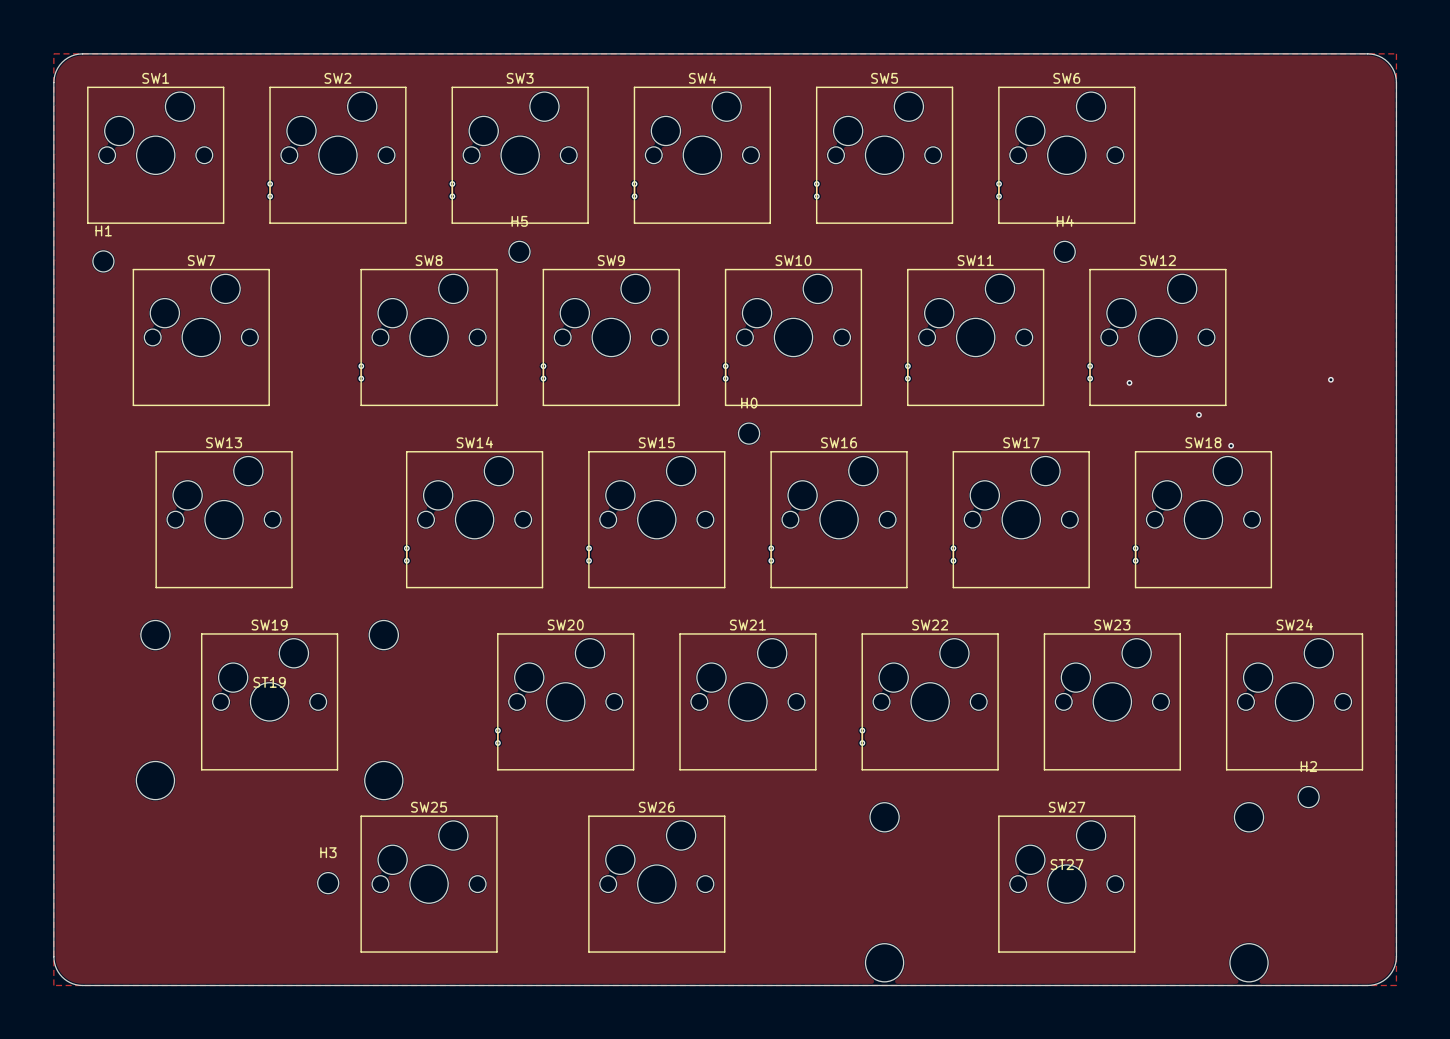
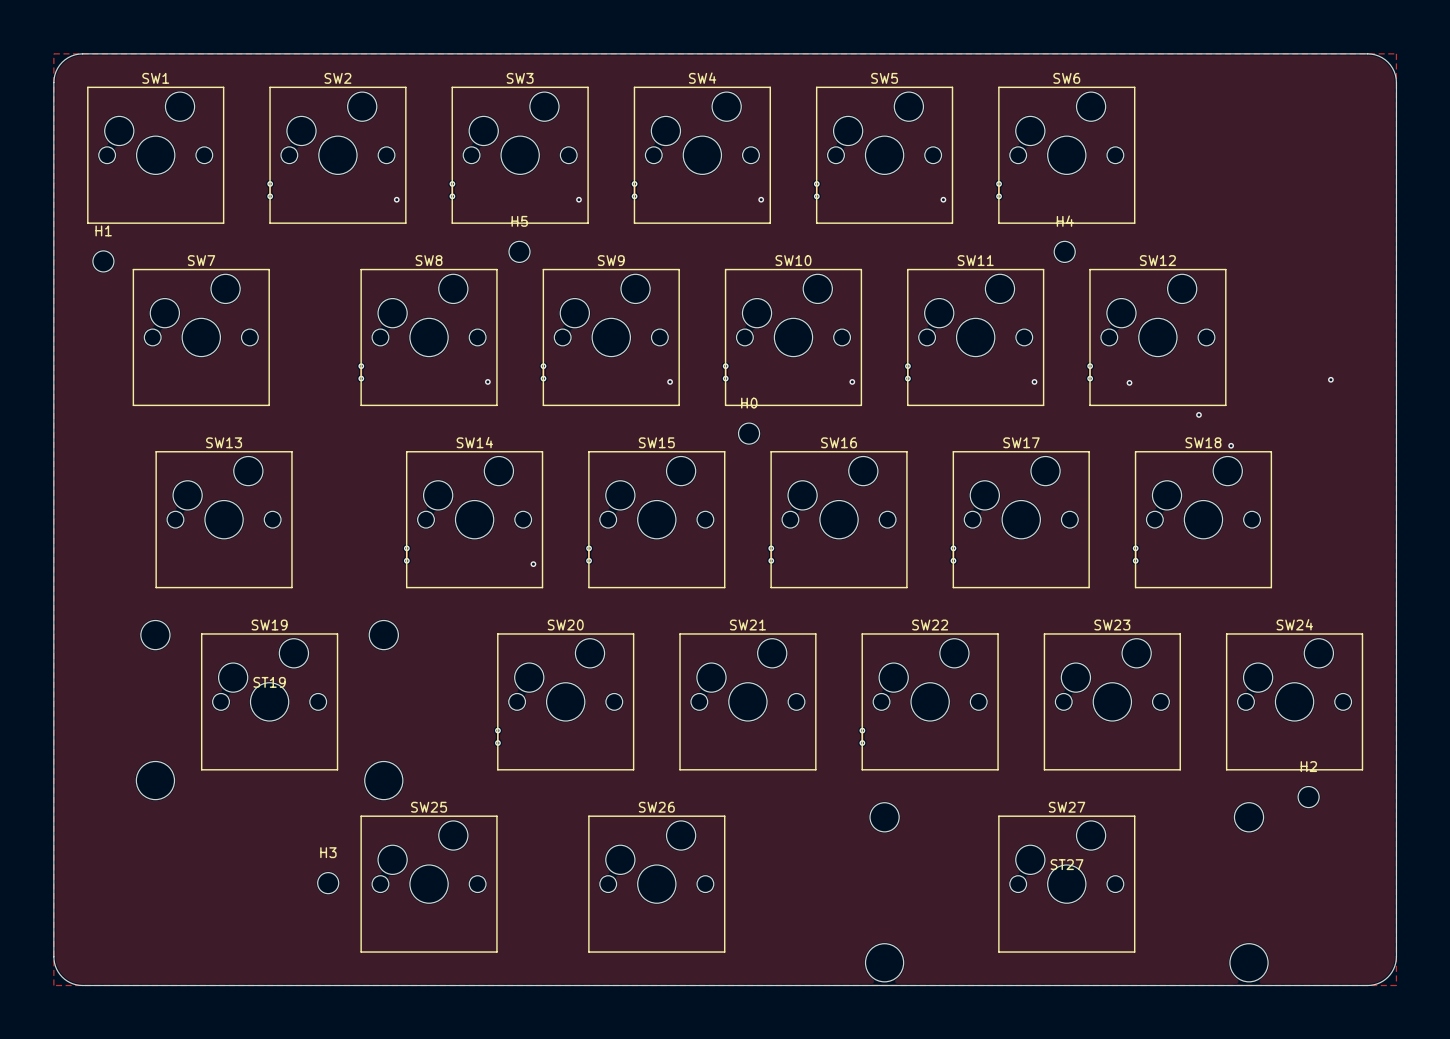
via: none -> (396, 199)
via: none -> (578, 199)
via: none -> (761, 199)
via: none -> (943, 199)
via: none -> (487, 381)
via: none -> (670, 381)
via: none -> (852, 381)
via: none -> (1034, 381)
via: none -> (533, 564)

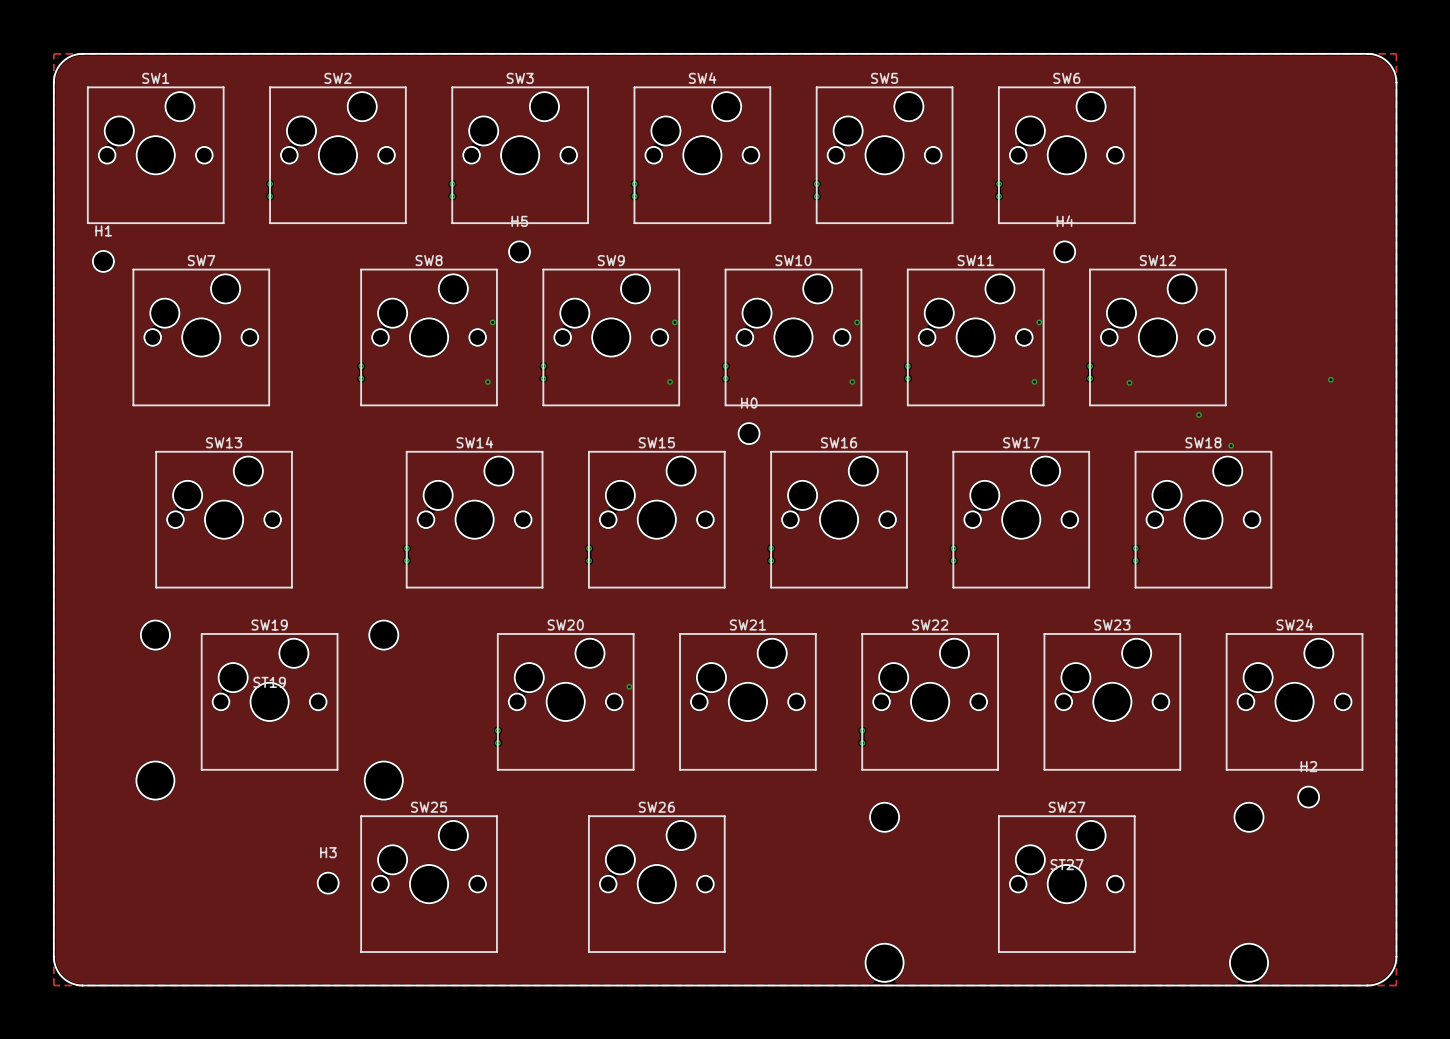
via: (396, 199) -> none
via: (578, 199) -> none
via: (761, 199) -> none
via: (943, 199) -> none
via: none -> (492, 322)
via: none -> (674, 322)
via: none -> (857, 322)
via: none -> (1039, 322)
via: (533, 564) -> none
via: none -> (629, 686)

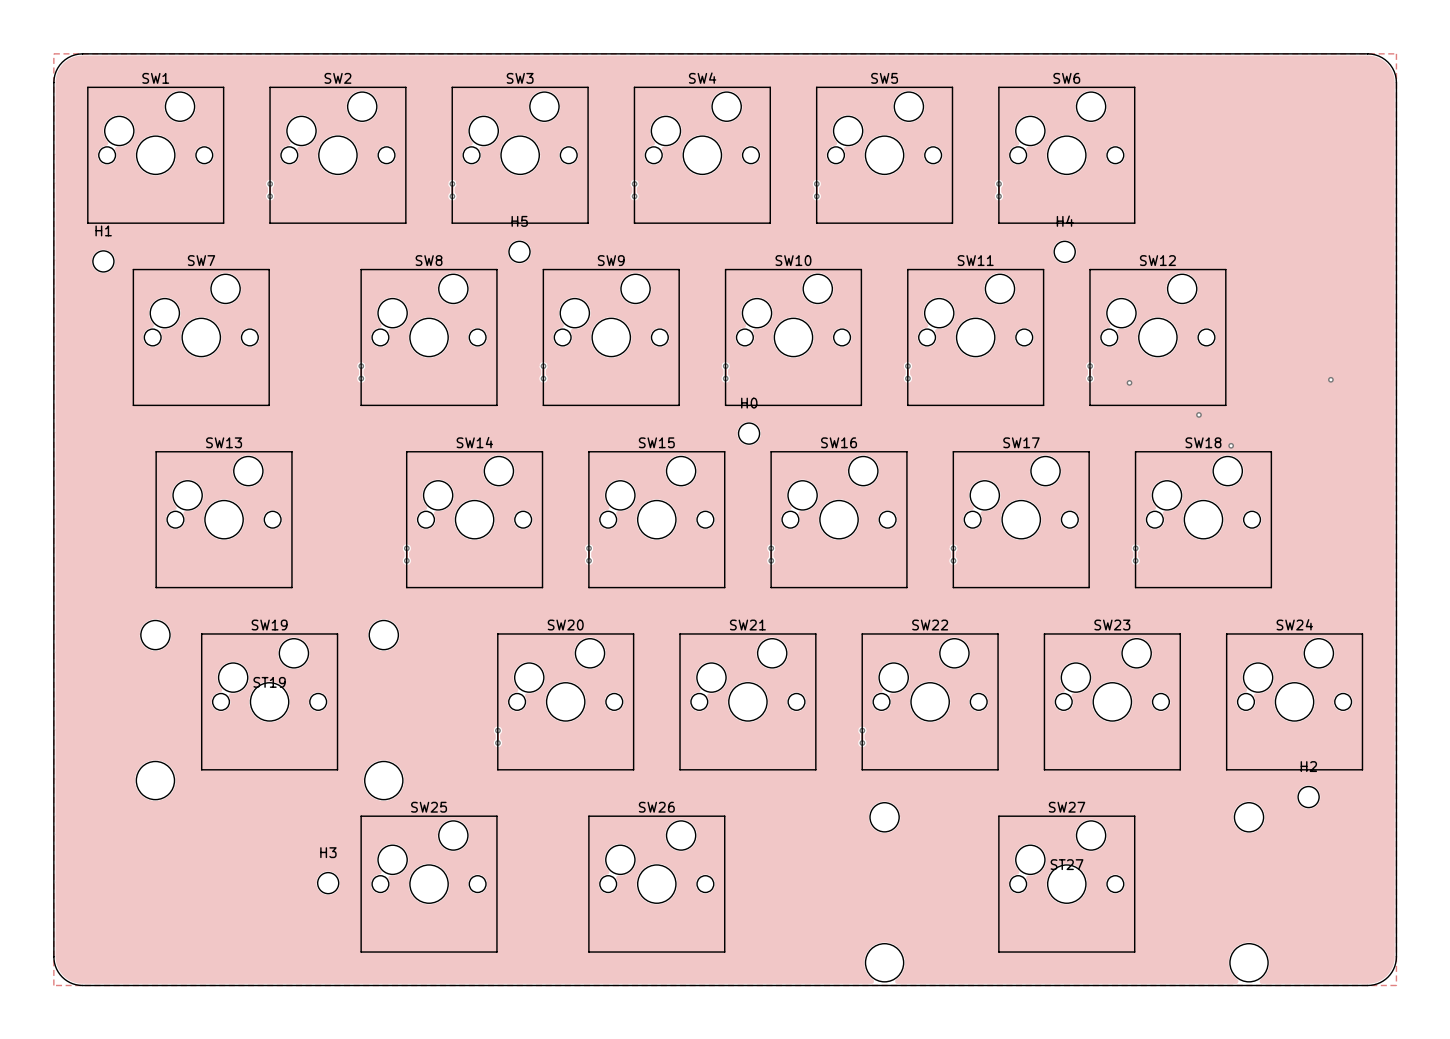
via: (492, 322) -> none
via: (674, 322) -> none
via: (857, 322) -> none
via: (1039, 322) -> none
via: (487, 381) -> none
via: (670, 381) -> none
via: (852, 381) -> none
via: (1034, 381) -> none
via: (629, 686) -> none

